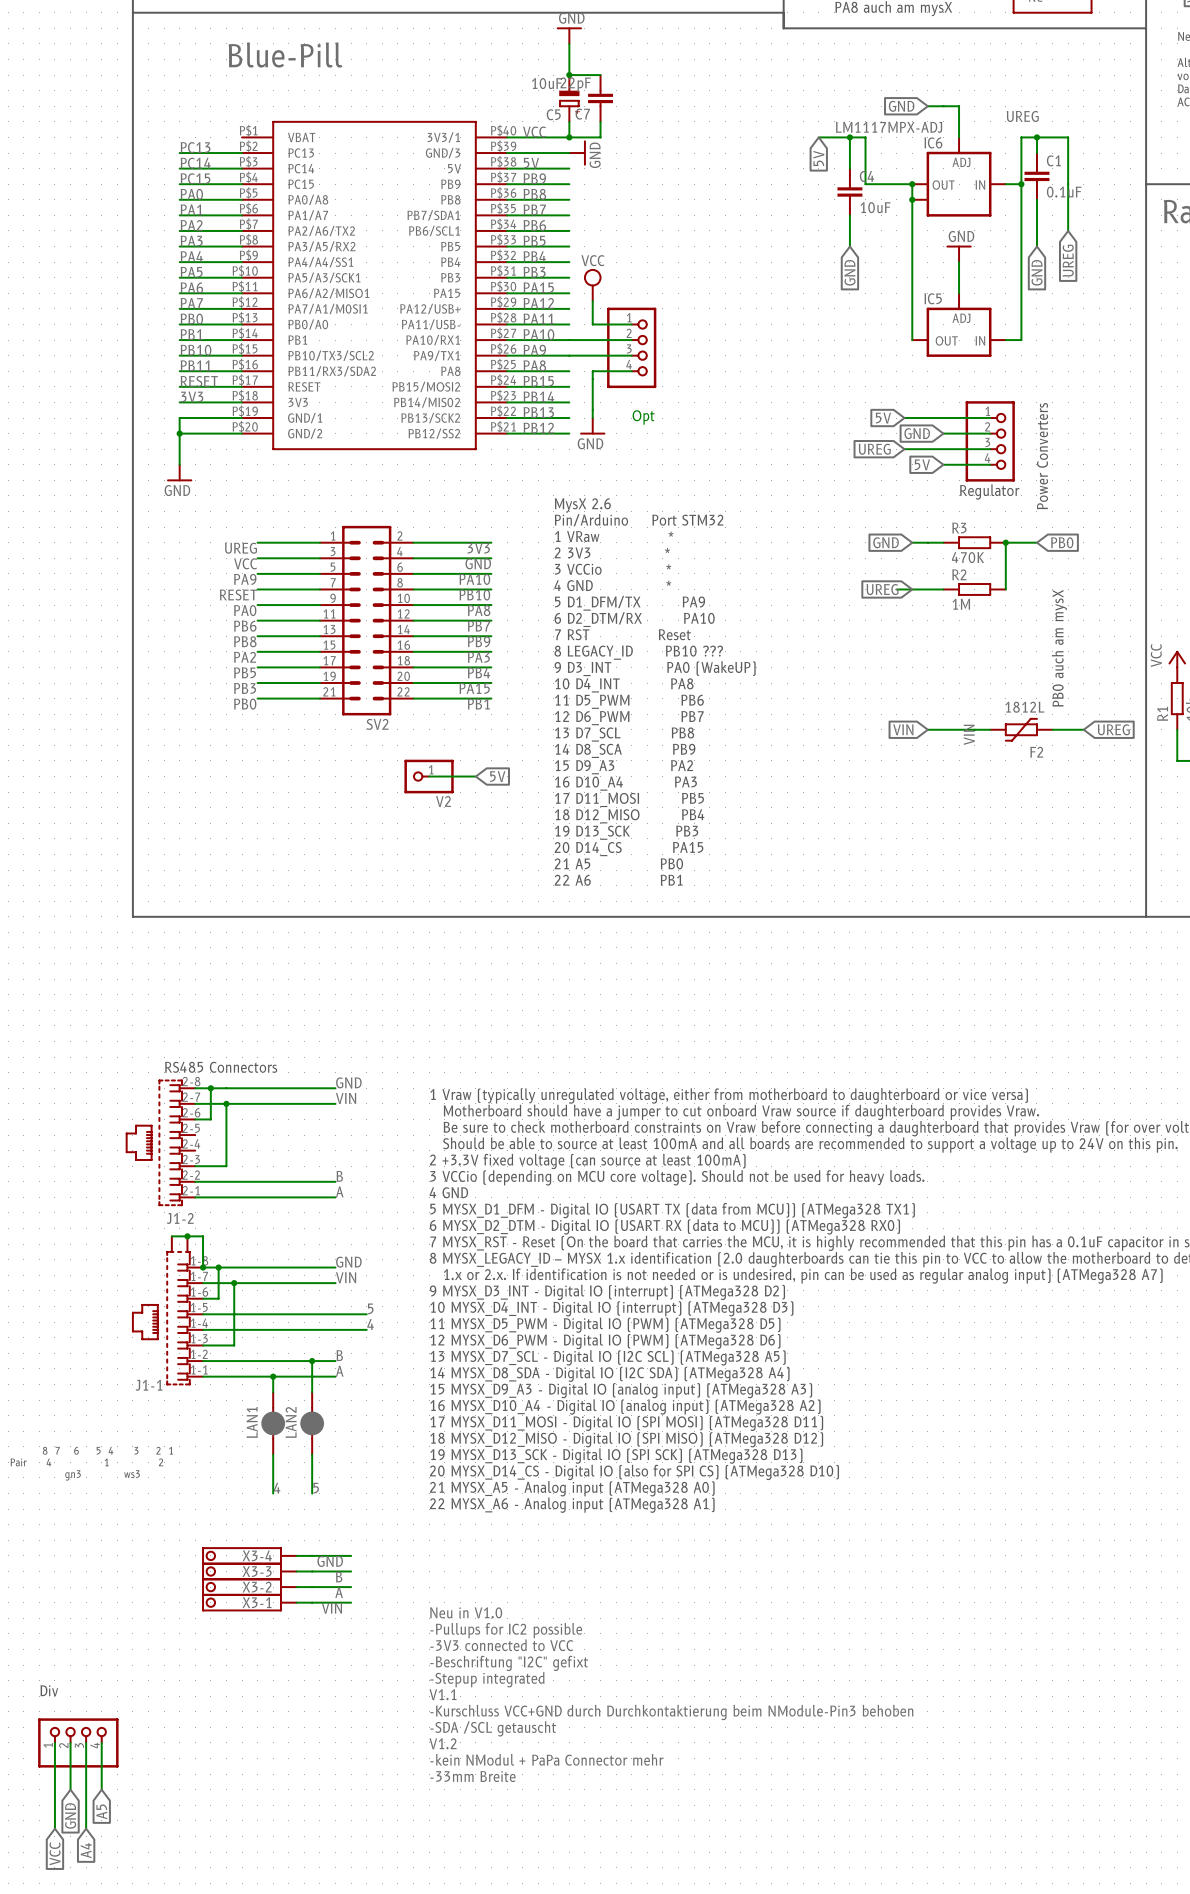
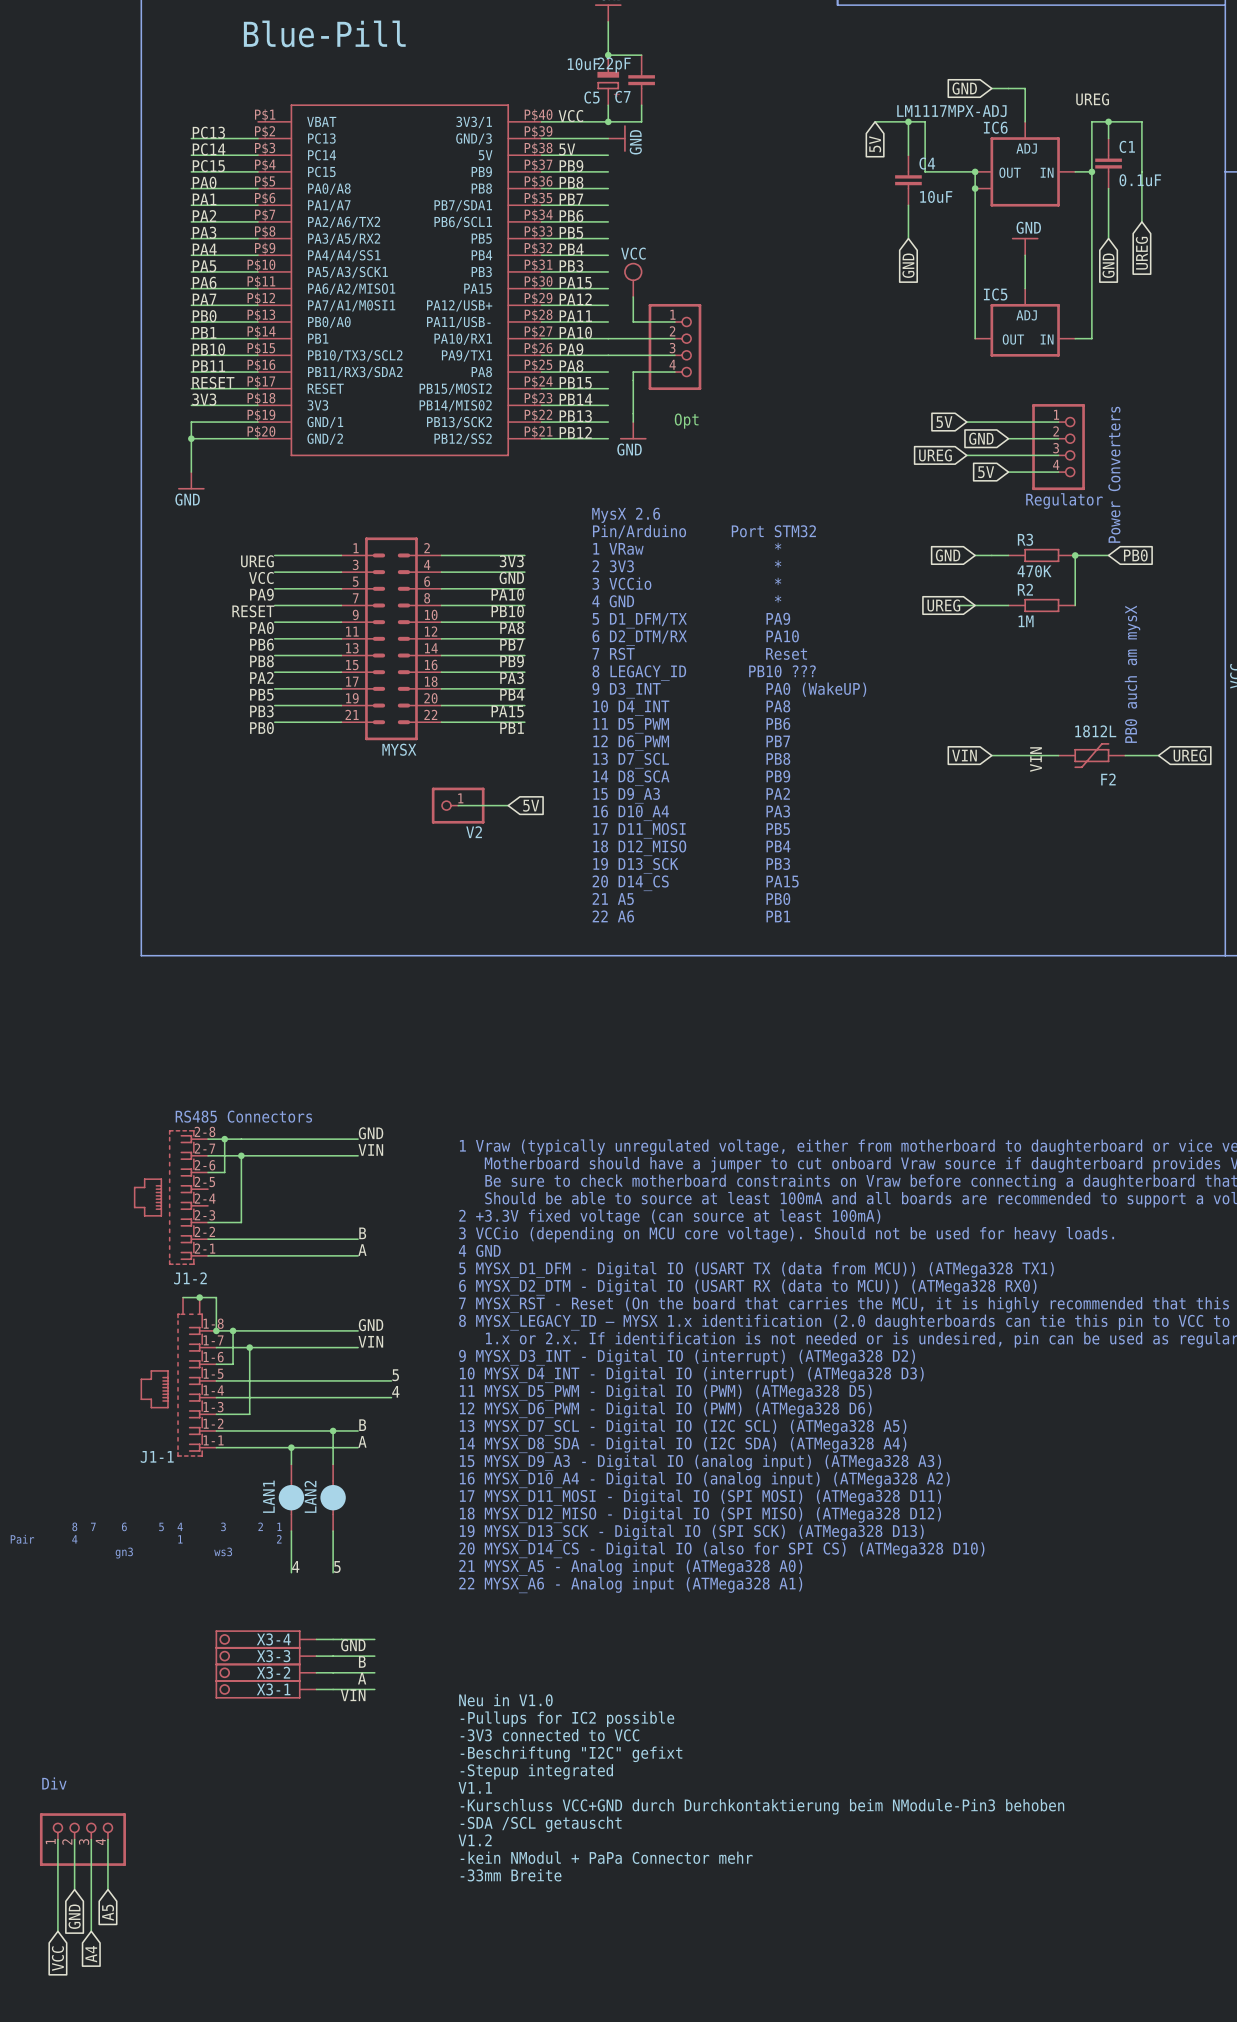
SV2 name: SV2 (377, 724) -> MYSX (399, 749)

